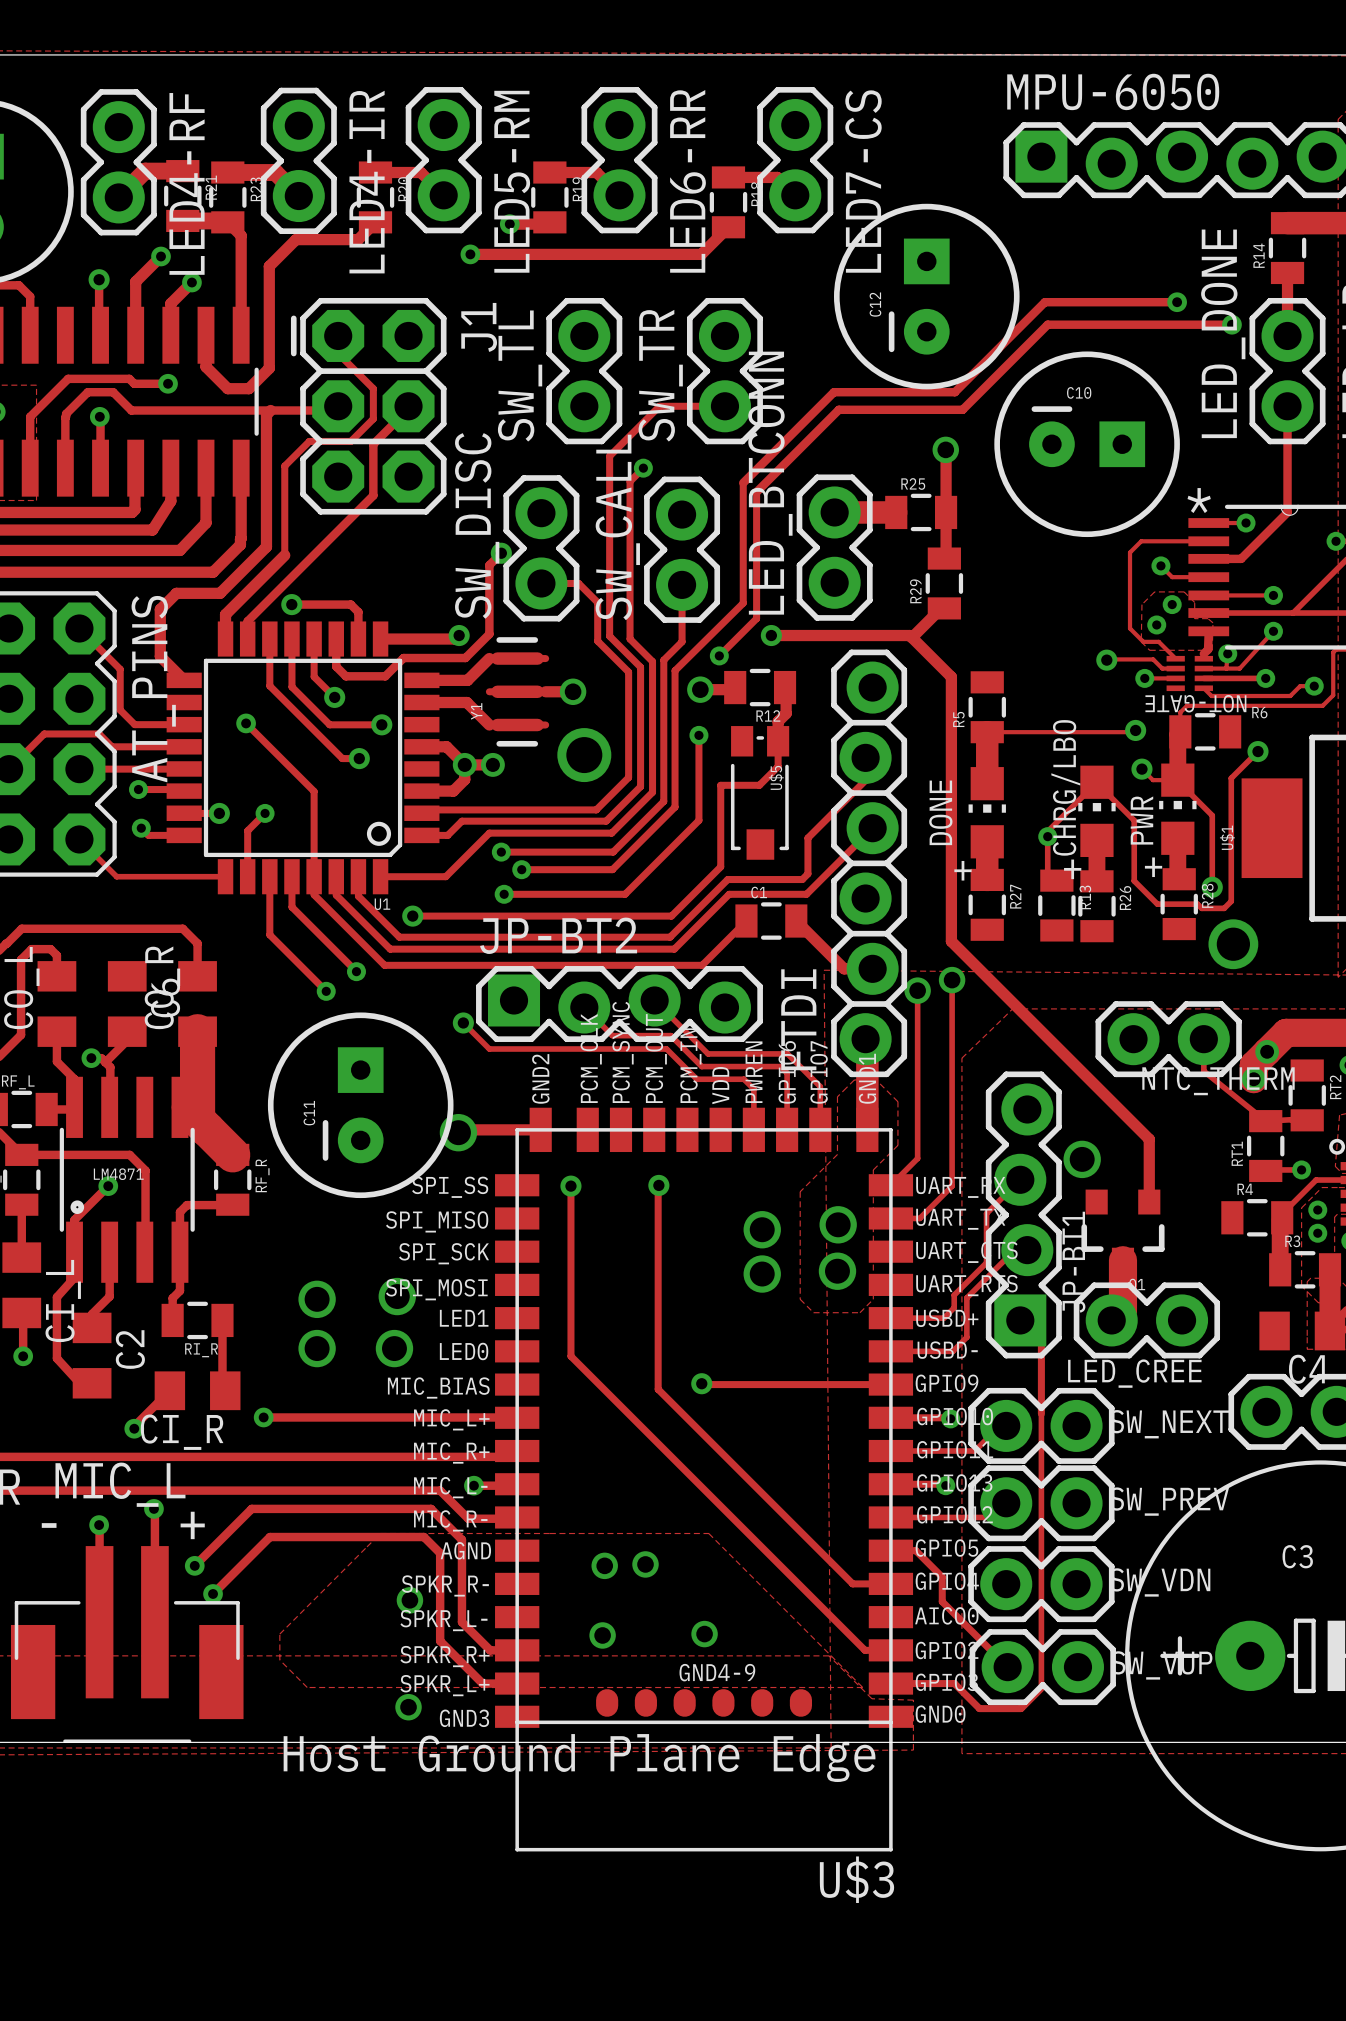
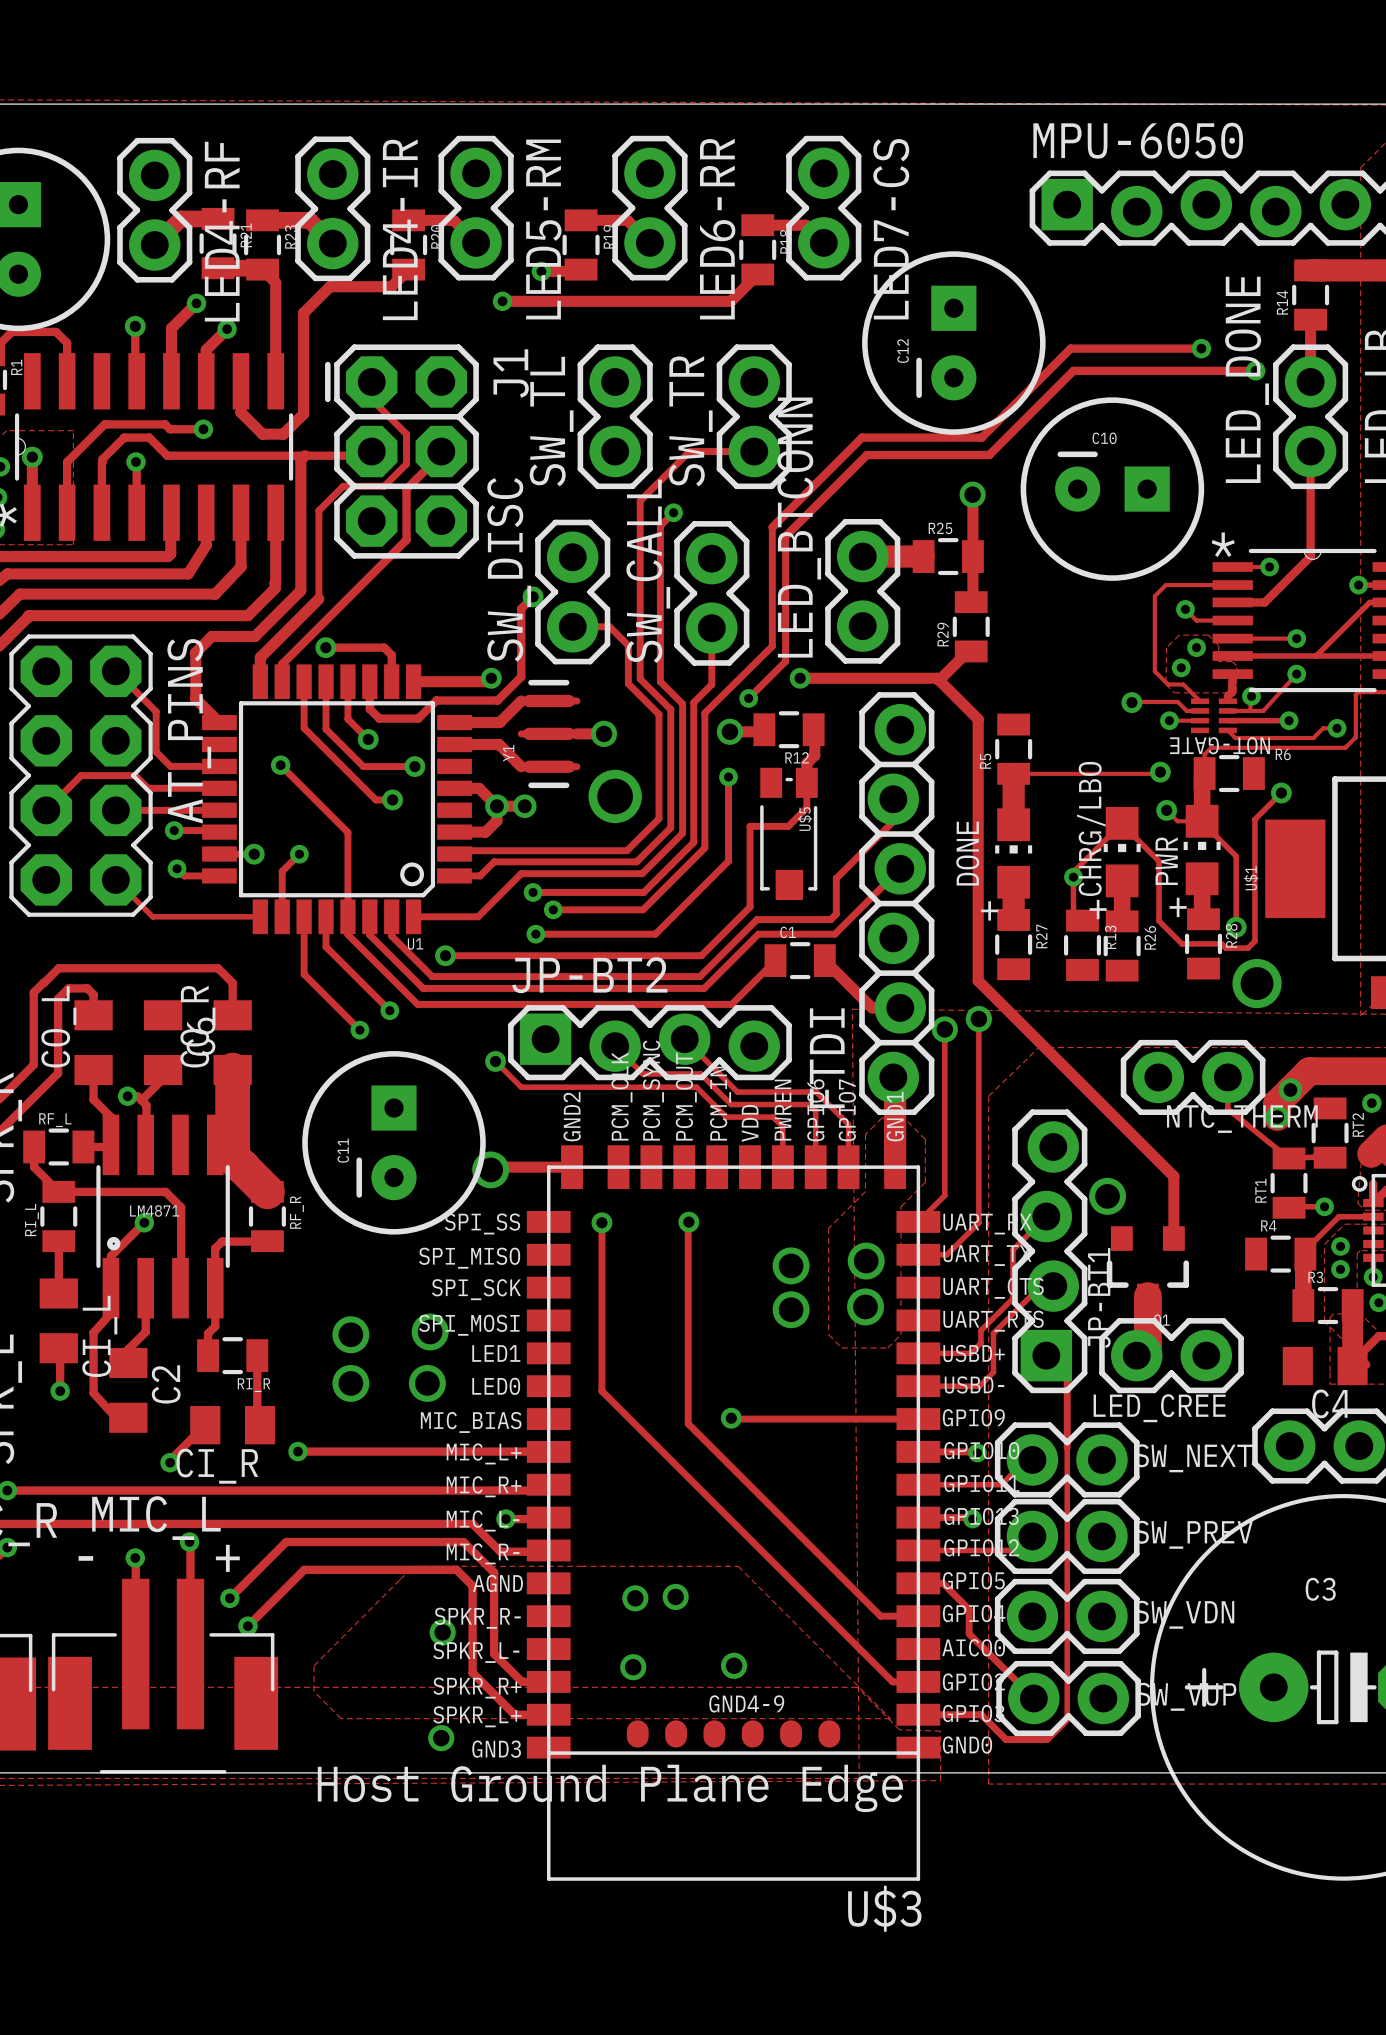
RI_R name position: RI_R (201, 1350) -> RI_R (253, 1385)

